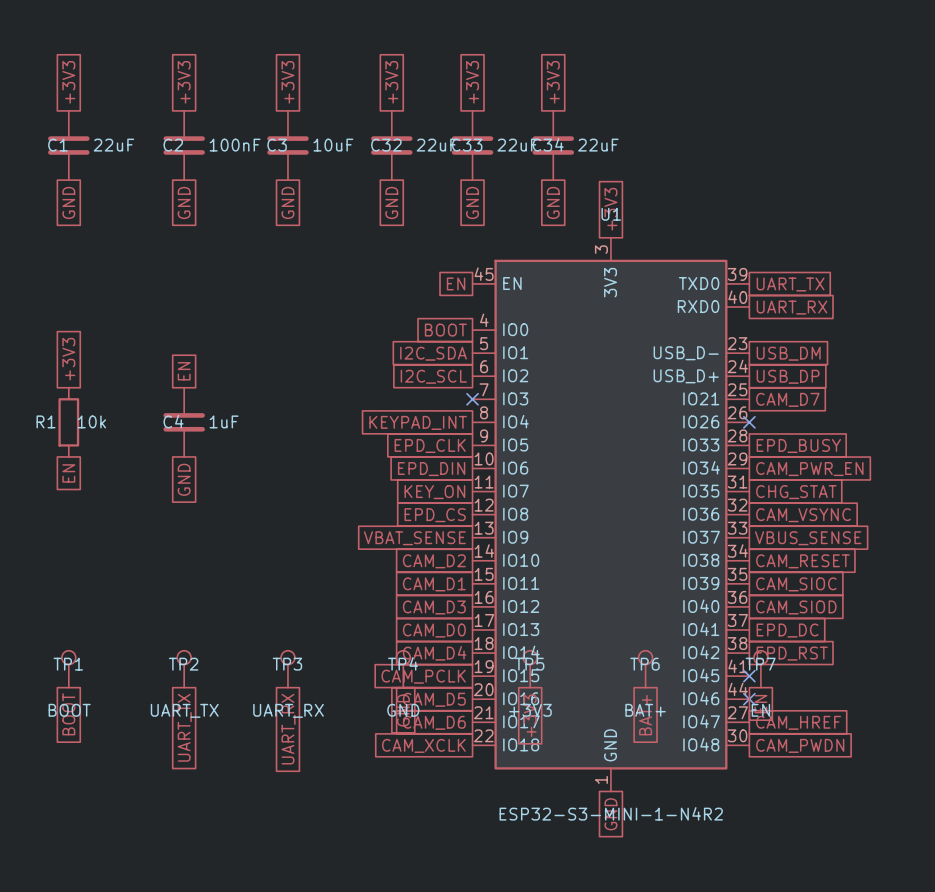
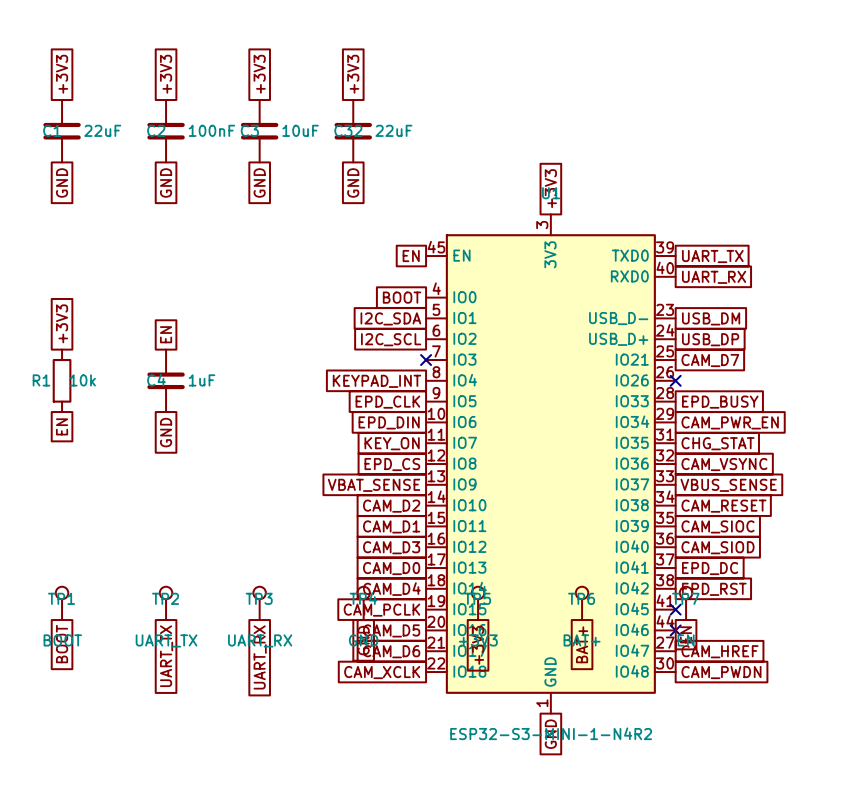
global label: +3V3 (472, 82) -> none
global label: +3V3 (553, 82) -> none
C33: 22uF (472, 145) -> none
C34: 22uF (553, 145) -> none
global label: GND (472, 202) -> none
global label: GND (553, 202) -> none

